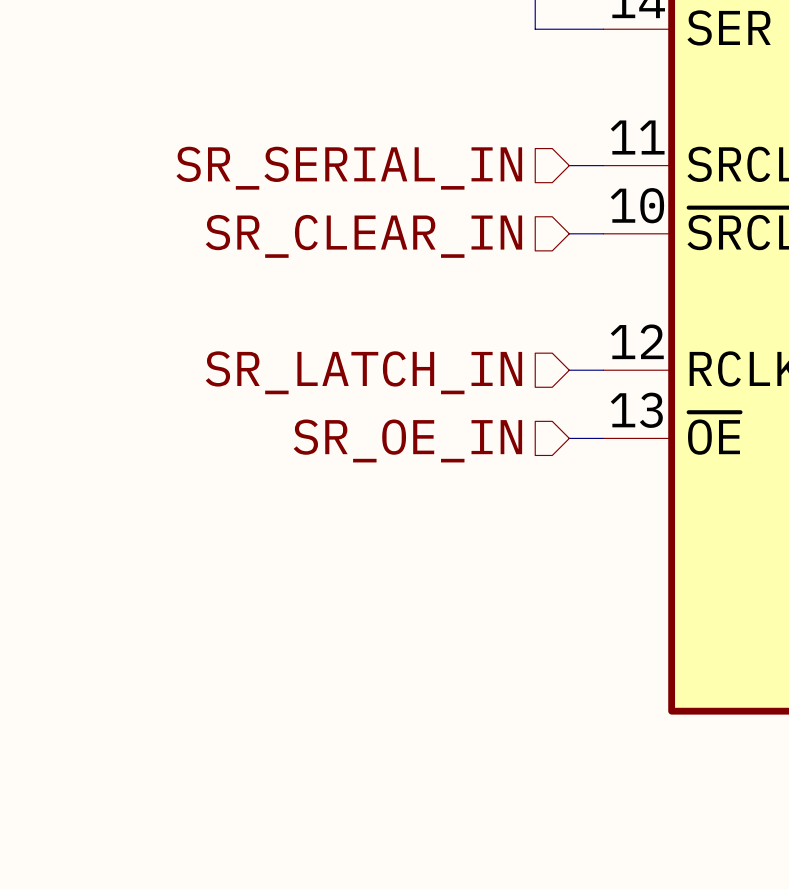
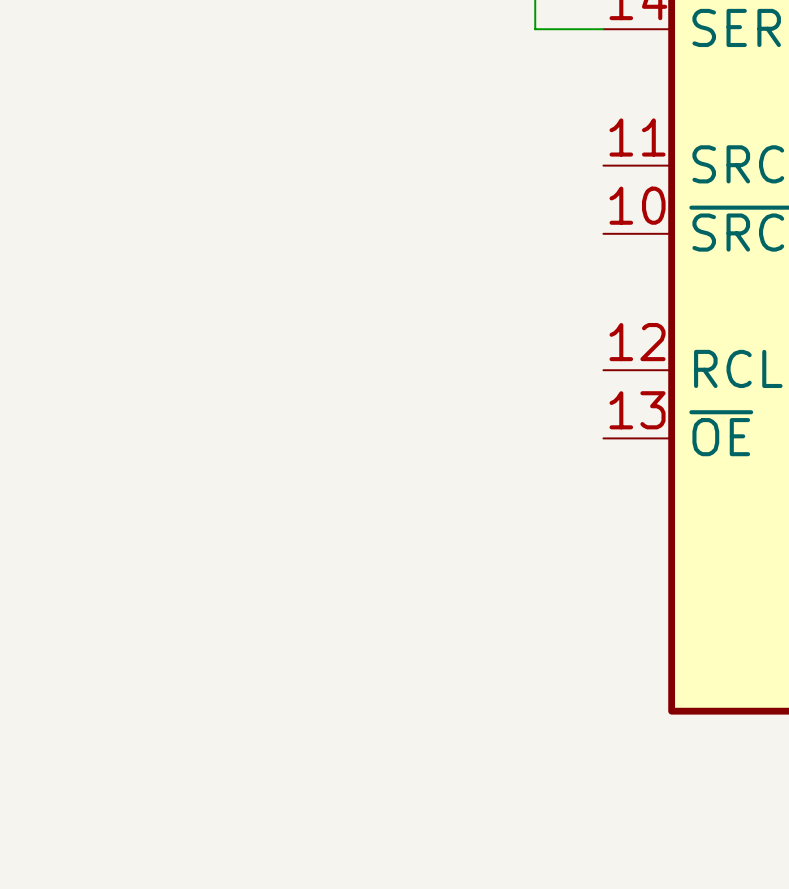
wire: (569, 165) (603, 165) -> none
hierarchical label: SR_SERIAL_IN (349, 168) -> none
wire: (569, 233) (603, 233) -> none
hierarchical label: SR_CLEAR_IN (363, 236) -> none
wire: (569, 370) (603, 370) -> none
hierarchical label: SR_LATCH_IN (363, 372) -> none
wire: (569, 438) (603, 438) -> none
hierarchical label: SR_OE_IN (407, 440) -> none

